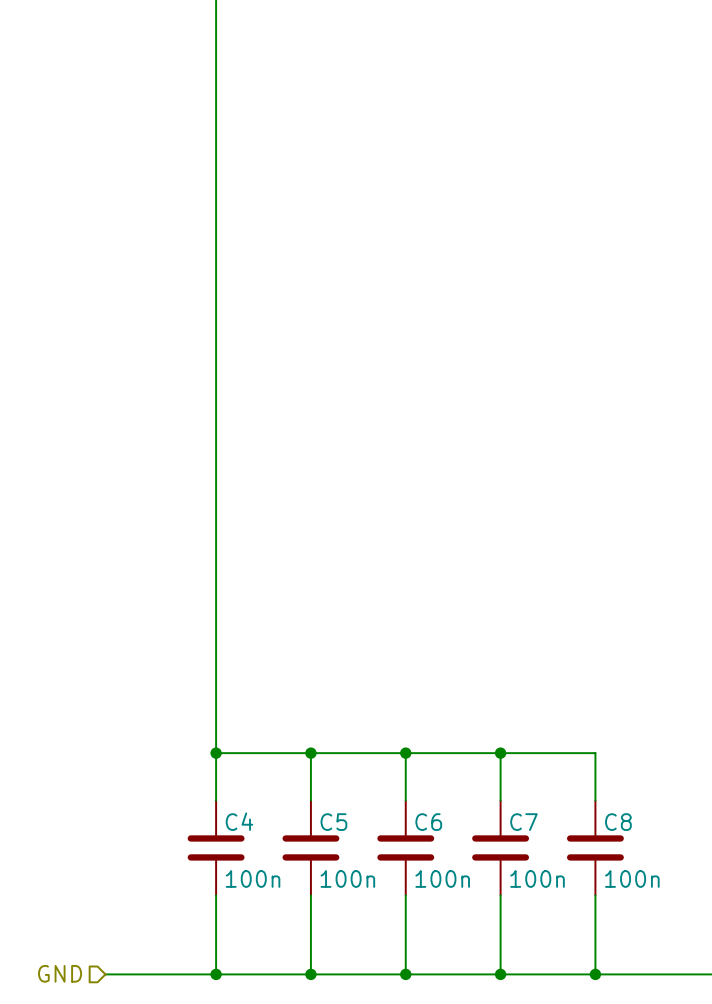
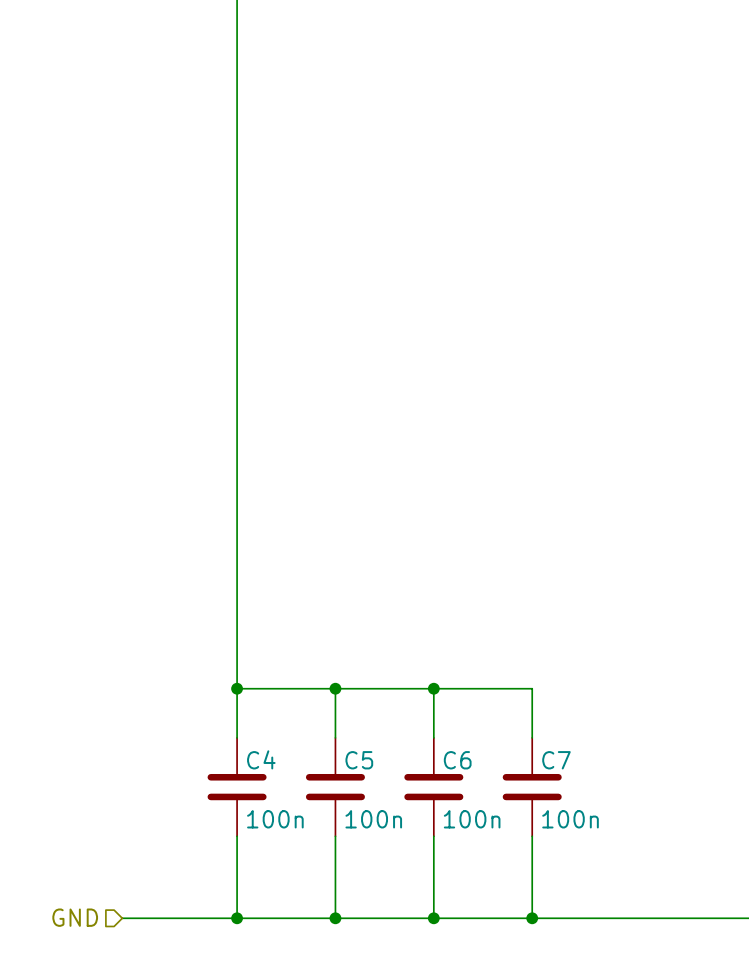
wire: (500, 753) (595, 753) (595, 800) -> none
junction: (500, 753) -> none
C8: 100n (595, 847) -> none
wire: (595, 895) (595, 974) -> none
junction: (595, 974) -> none

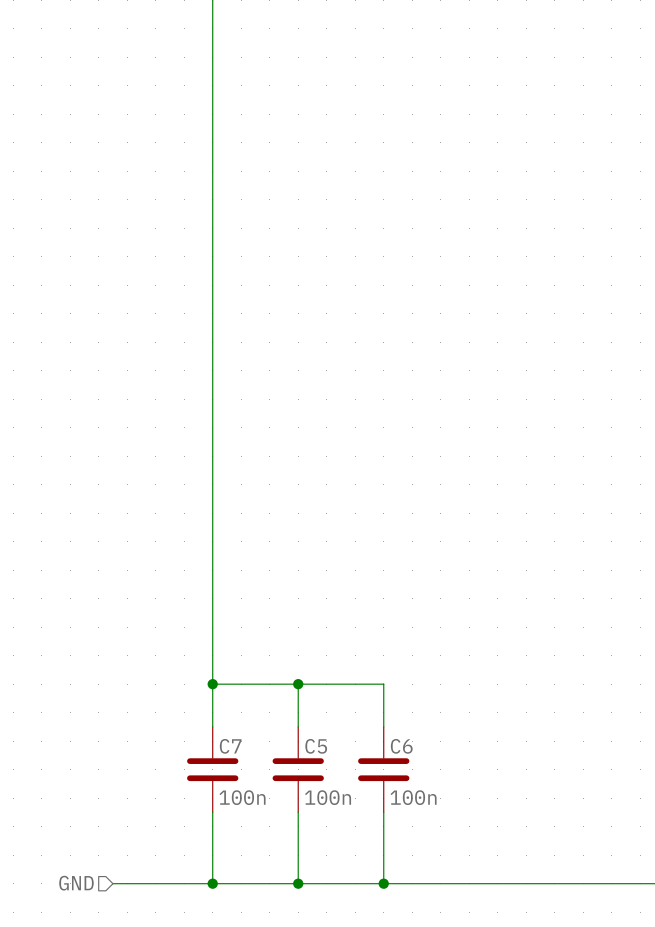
wire: (433, 688) (532, 688) (532, 737) -> none
junction: (433, 688) -> none
C4 name: C4 (261, 759) -> C7 (230, 746)
C7: 100n (532, 787) -> none
wire: (532, 836) (532, 918) -> none
junction: (532, 918) -> none

